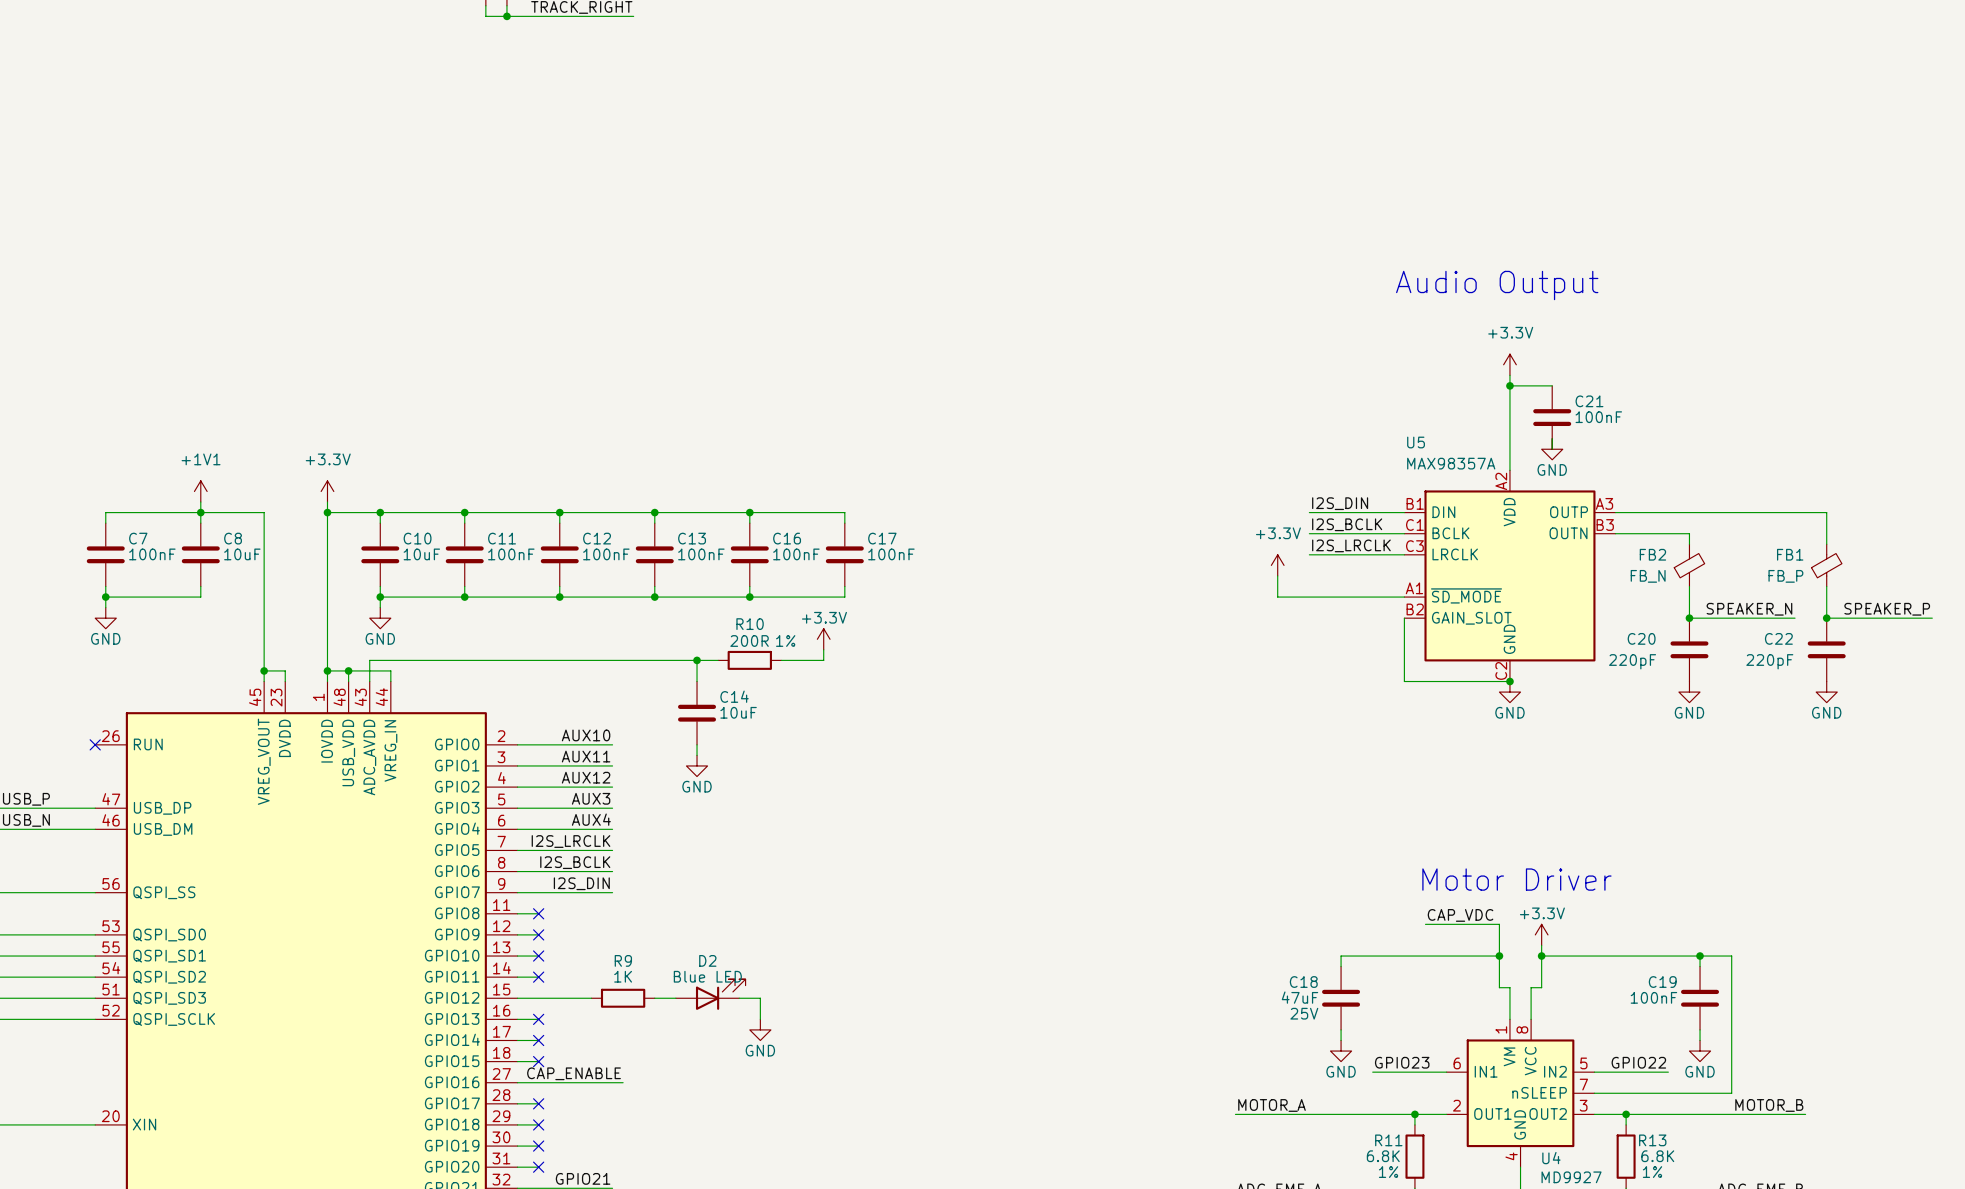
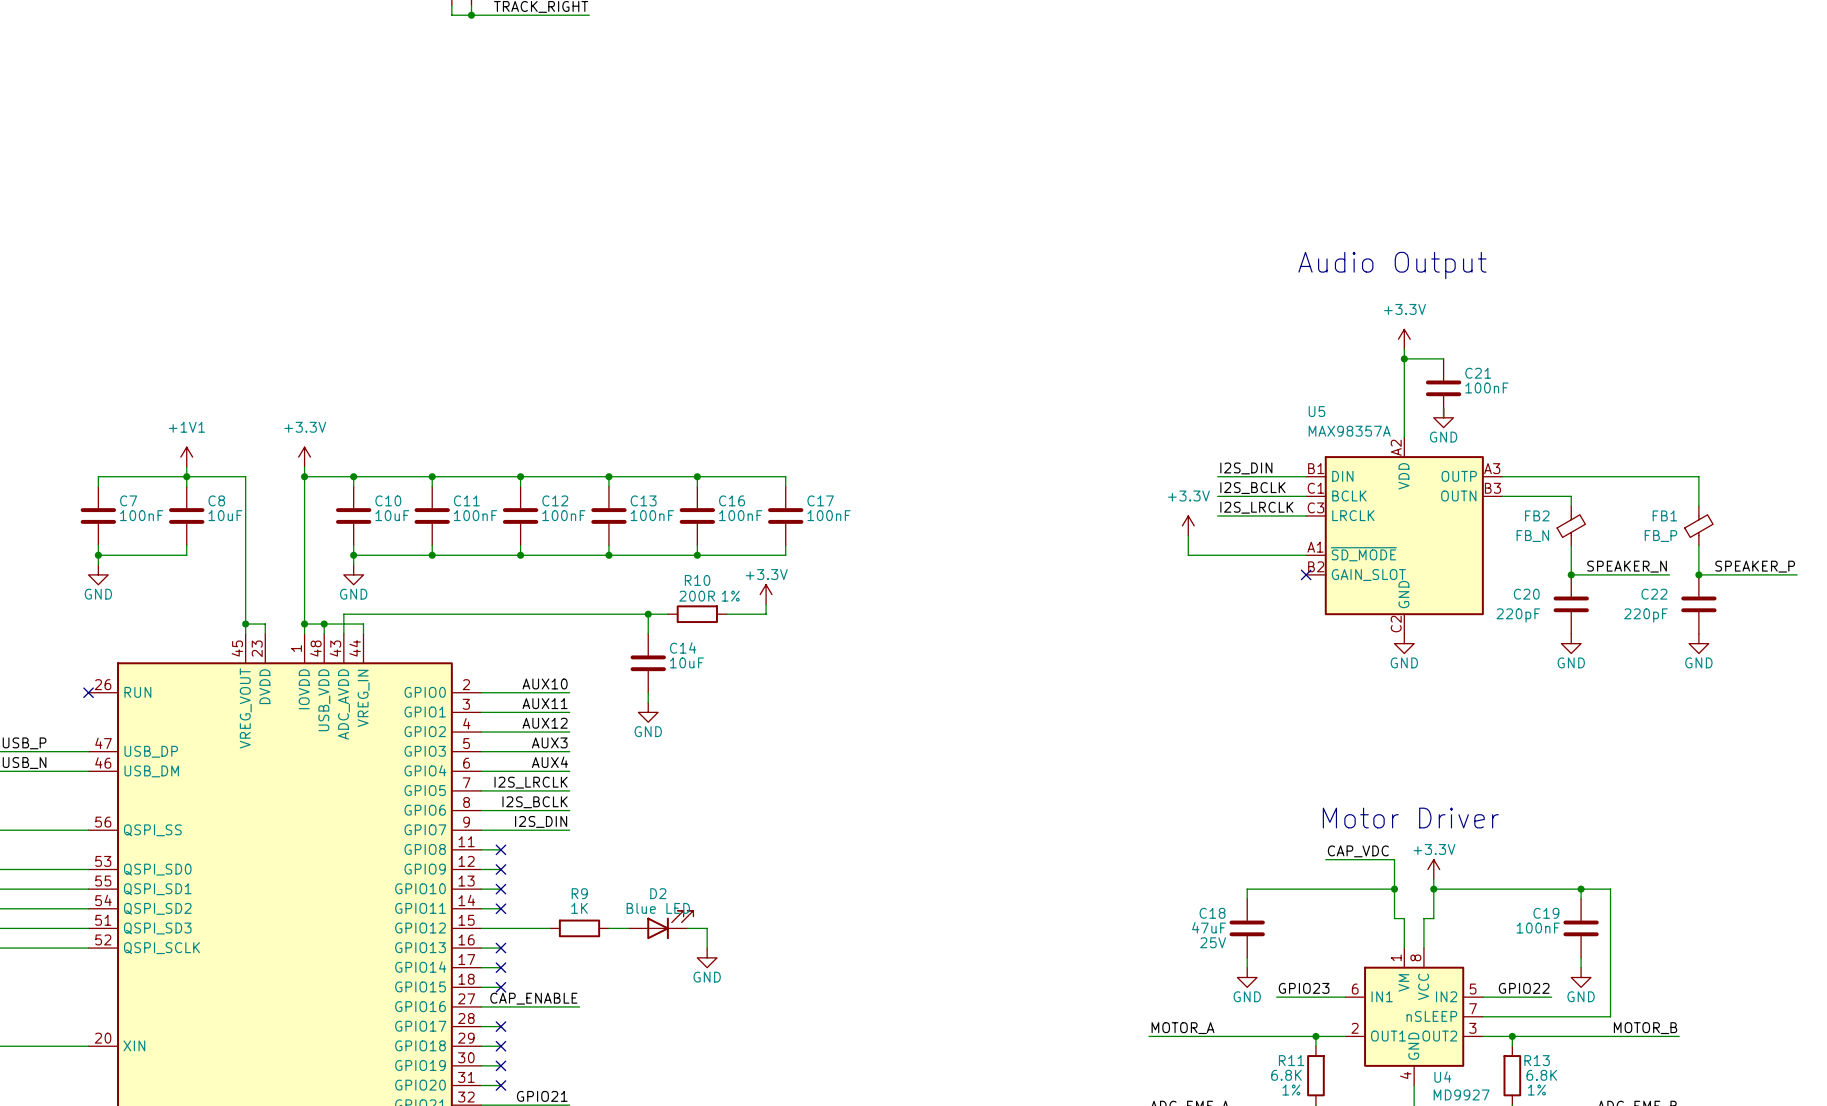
wire: (1404, 618) (1404, 681) (1509, 681) -> none
no-connect mark: none -> (1306, 574)
junction: (1509, 681) -> none

